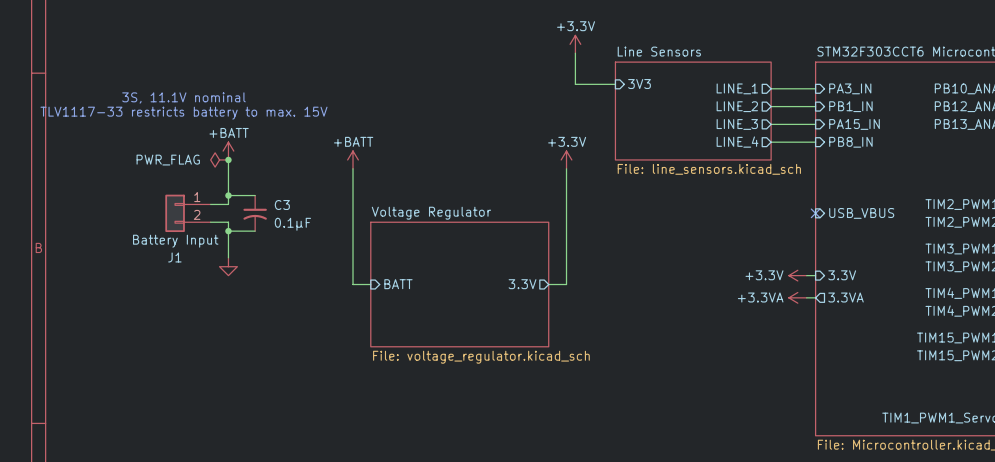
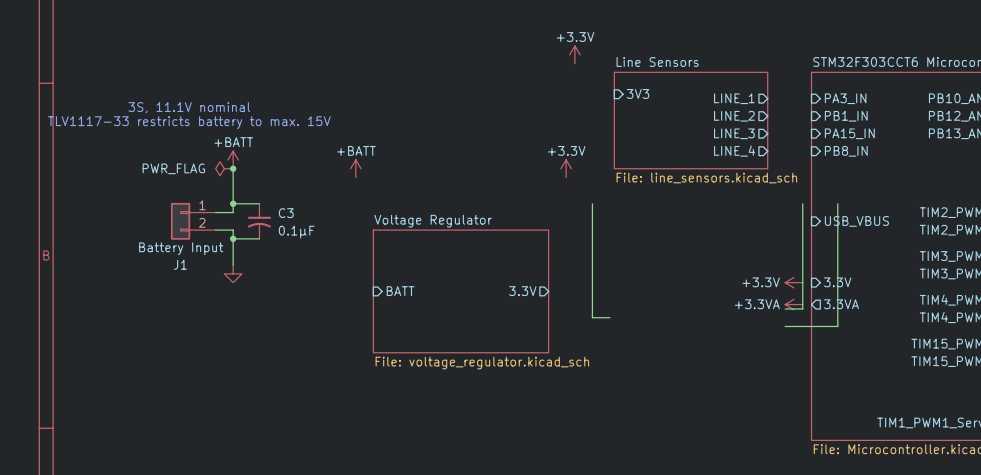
wire: (575, 53) (575, 84) (615, 84) -> none
wire: (771, 88) (815, 88) -> none
wire: (771, 106) (815, 106) -> none
wire: (771, 124) (815, 124) -> none
wire: (771, 142) (815, 142) -> none
wire: (353, 168) (353, 284) (370, 284) -> none
wire: (566, 168) (566, 284) (548, 284) -> none
wire: none -> (592, 203) (592, 317) (609, 317)
wire: none -> (802, 203) (802, 308) (785, 308)
wire: none -> (837, 203) (837, 326) (785, 326)
no-connect mark: (815, 213) -> none
wire: (806, 275) (815, 275) -> none
wire: (806, 297) (815, 297) -> none

